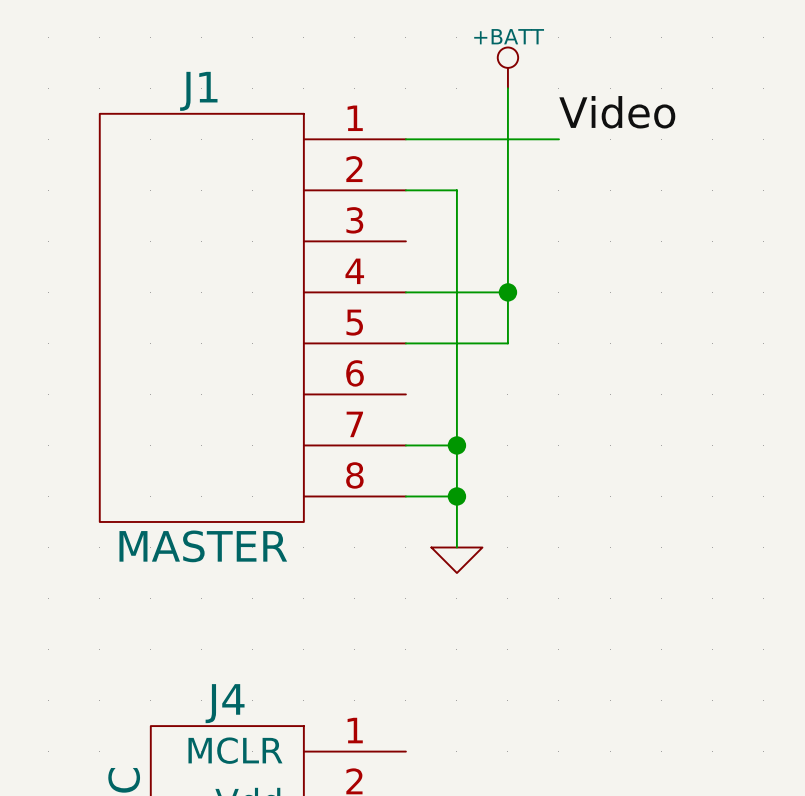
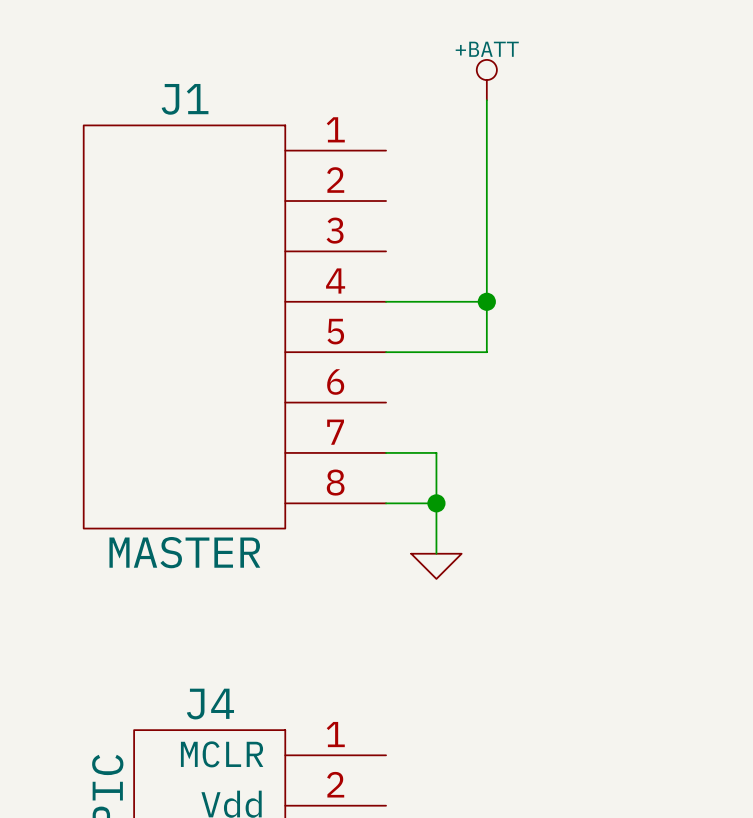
label: Video (617, 112) -> none
wire: (405, 139) (558, 139) -> none
wire: (405, 190) (456, 190) (456, 445) -> none
junction: (456, 445) -> none

